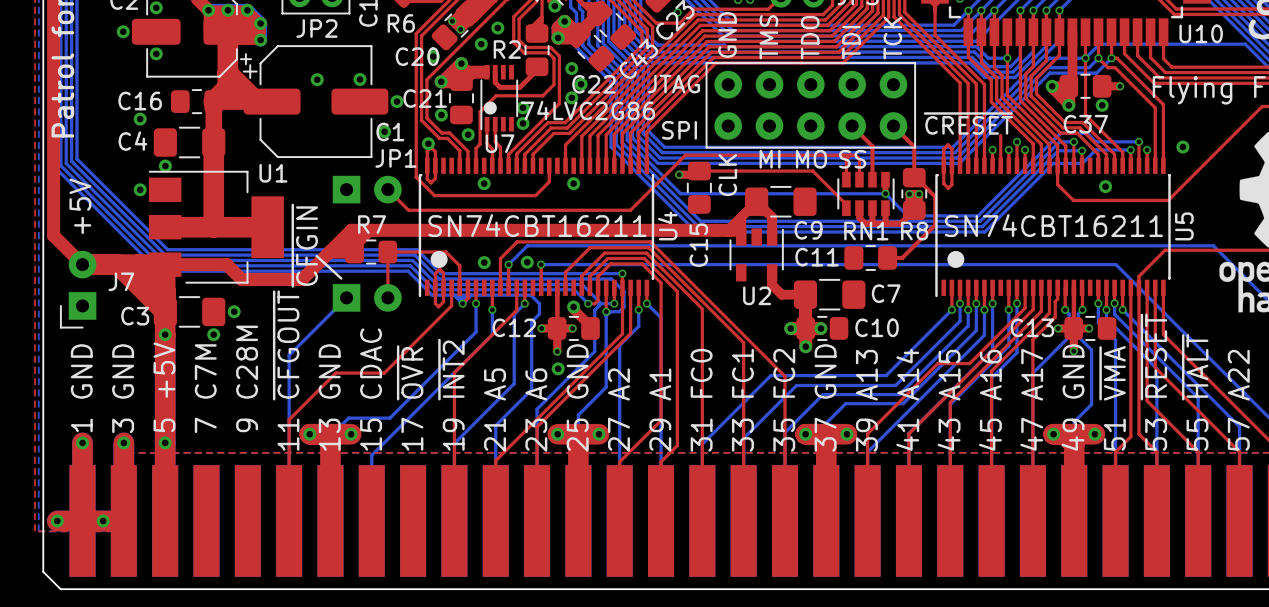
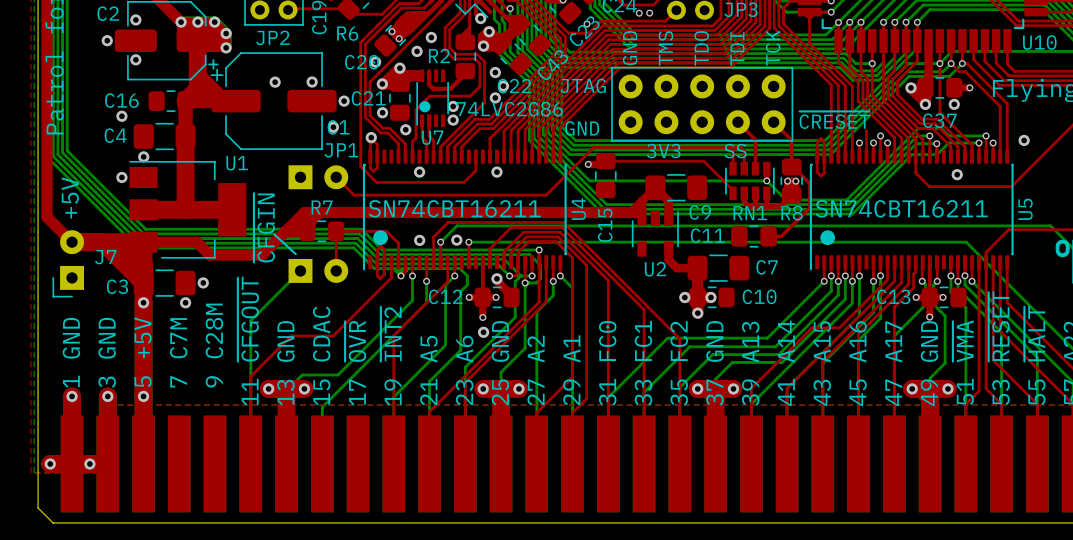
text: SPI (679, 130) -> GND (582, 128)
text: MI (770, 159) -> 3V3 (663, 151)
text: MO (811, 159) -> none
text: CLK (727, 175) -> none

